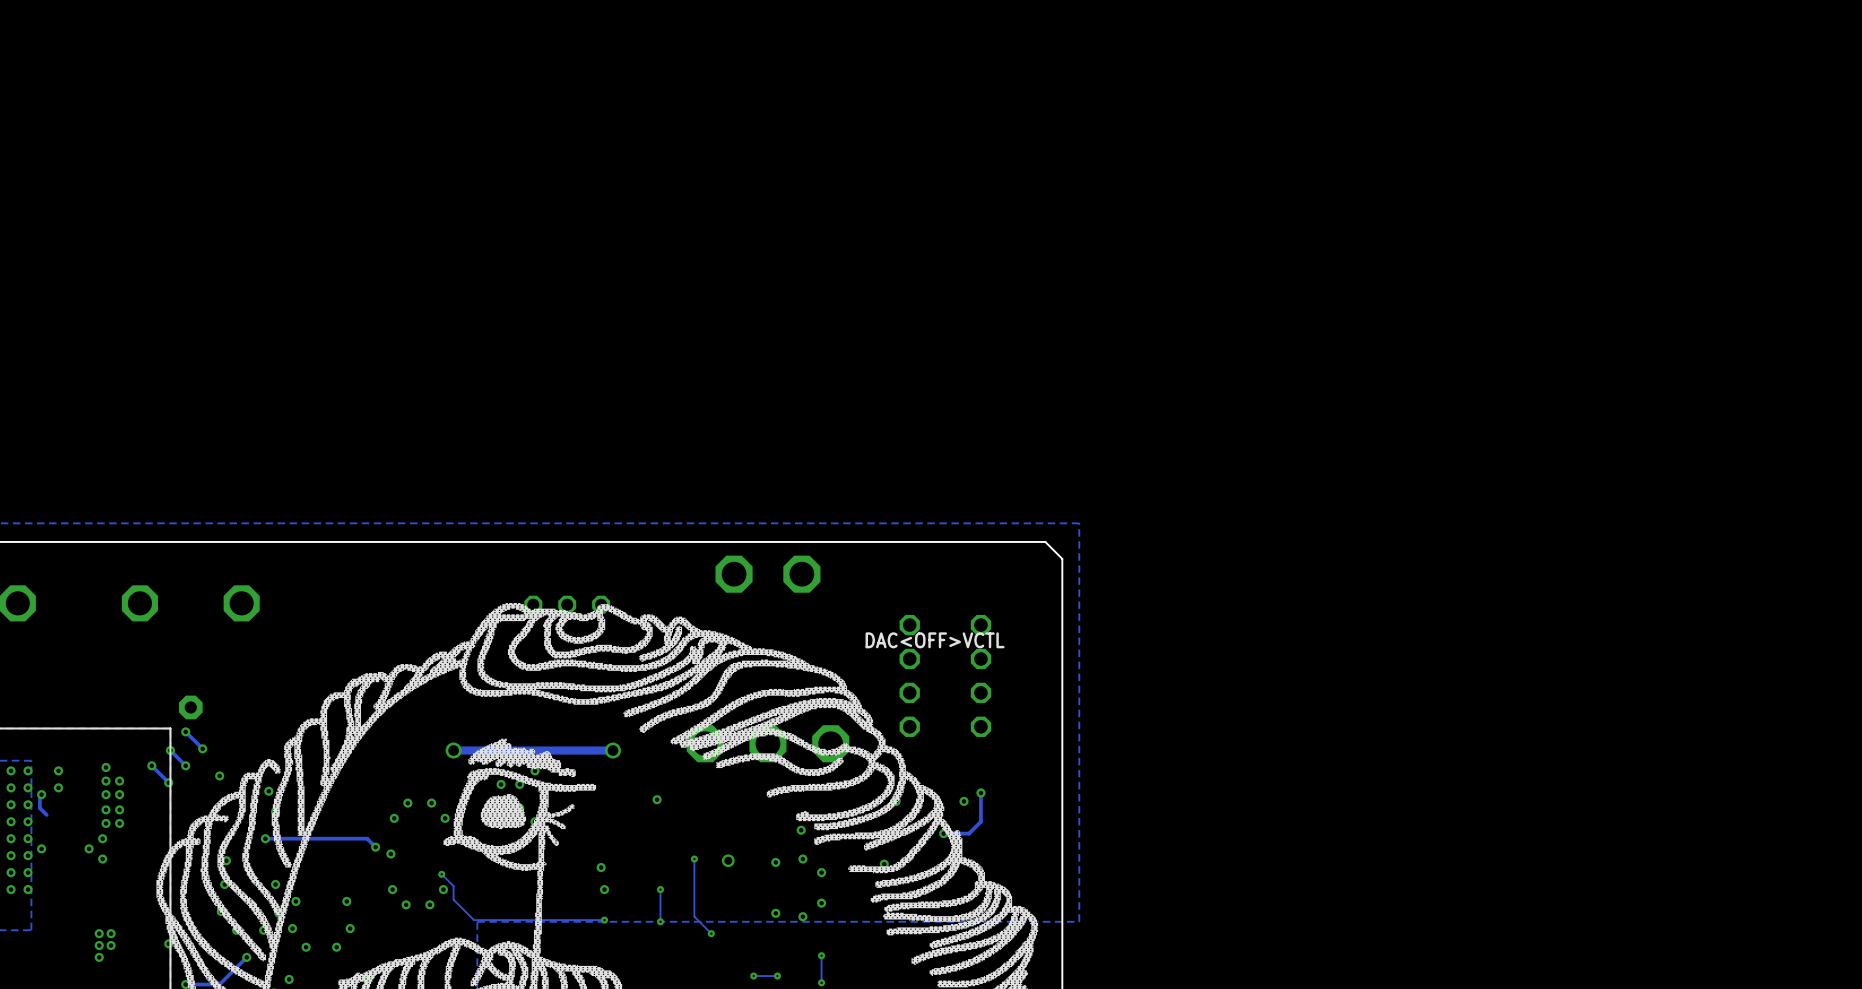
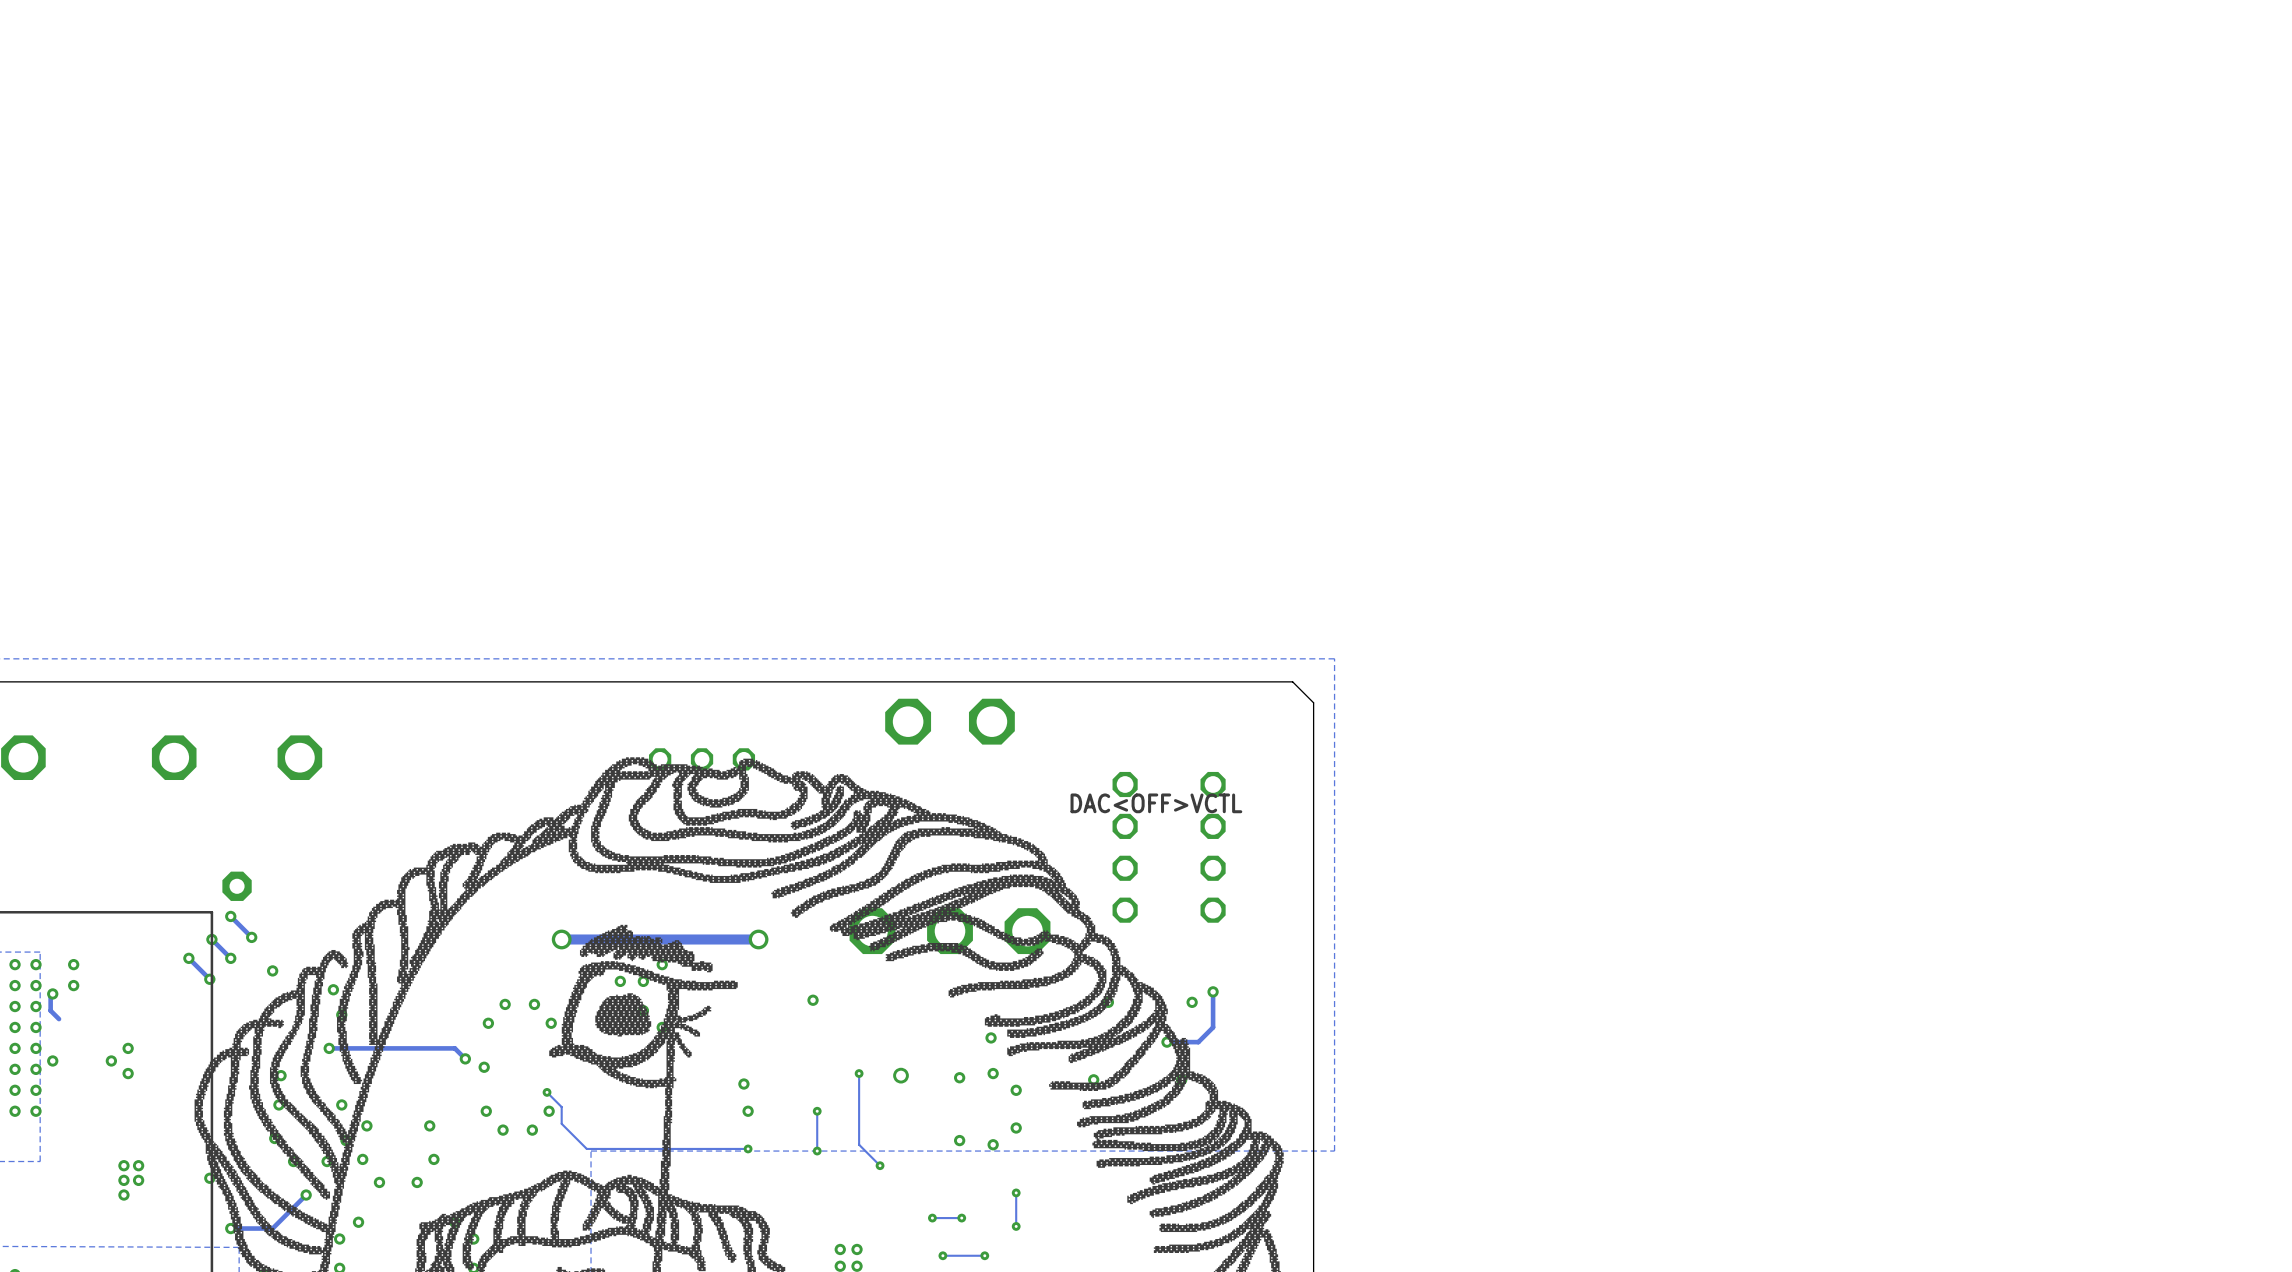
via: (106, 767) -> none
via: (106, 781) -> none
via: (119, 781) -> none
via: (106, 794) -> none
via: (119, 794) -> none
via: (106, 809) -> none
via: (119, 809) -> none
via: (106, 823) -> none
via: (119, 823) -> none

